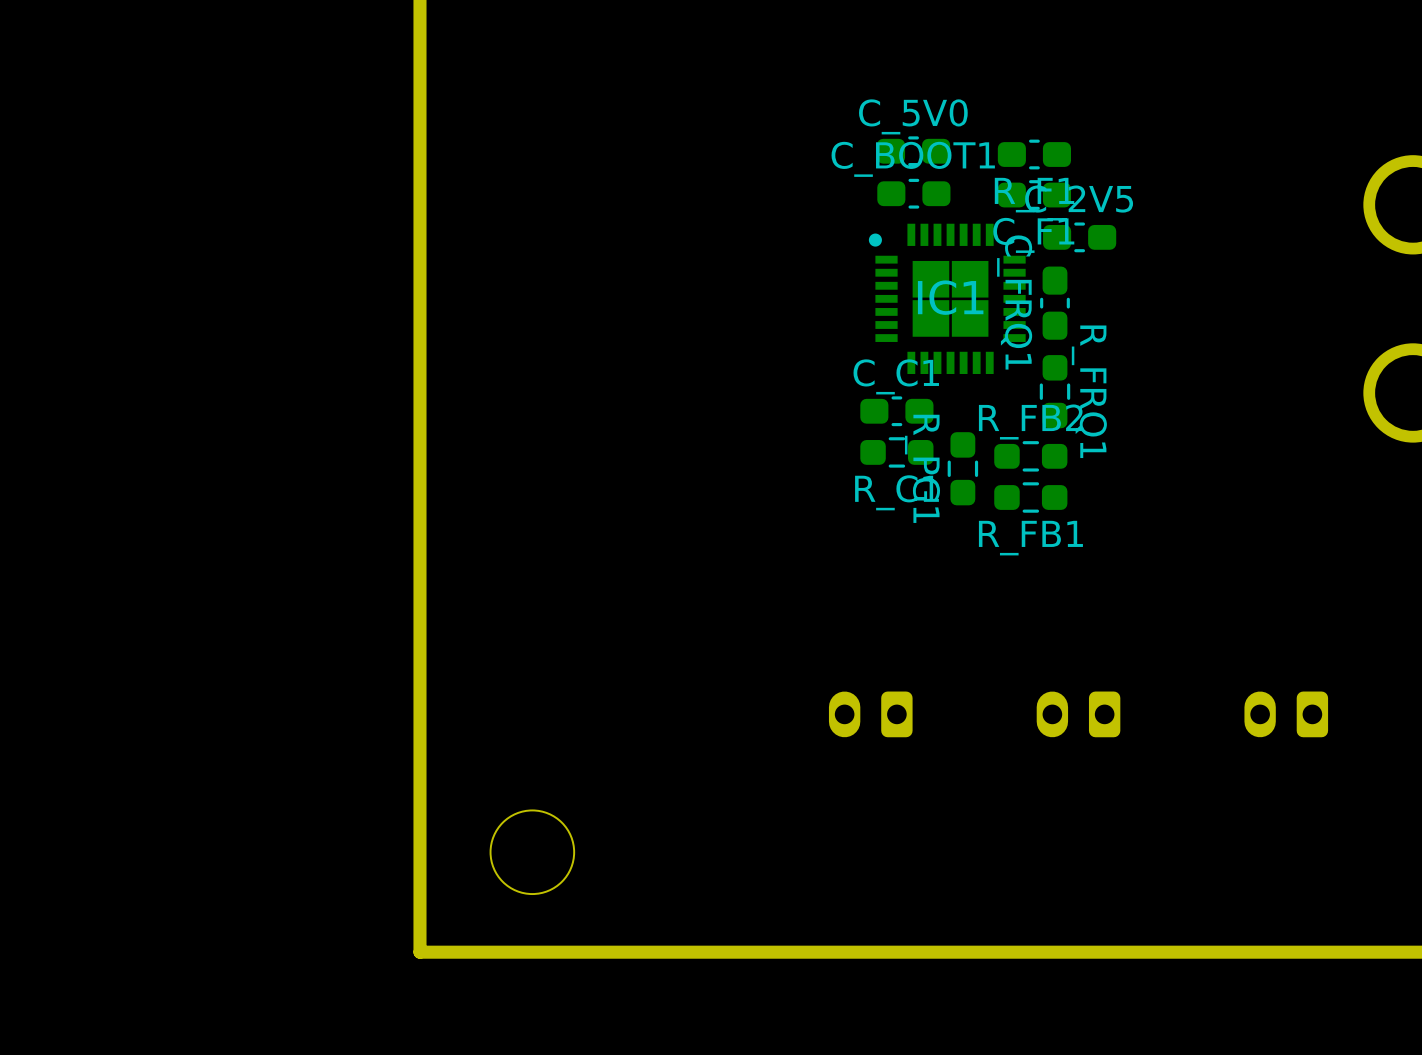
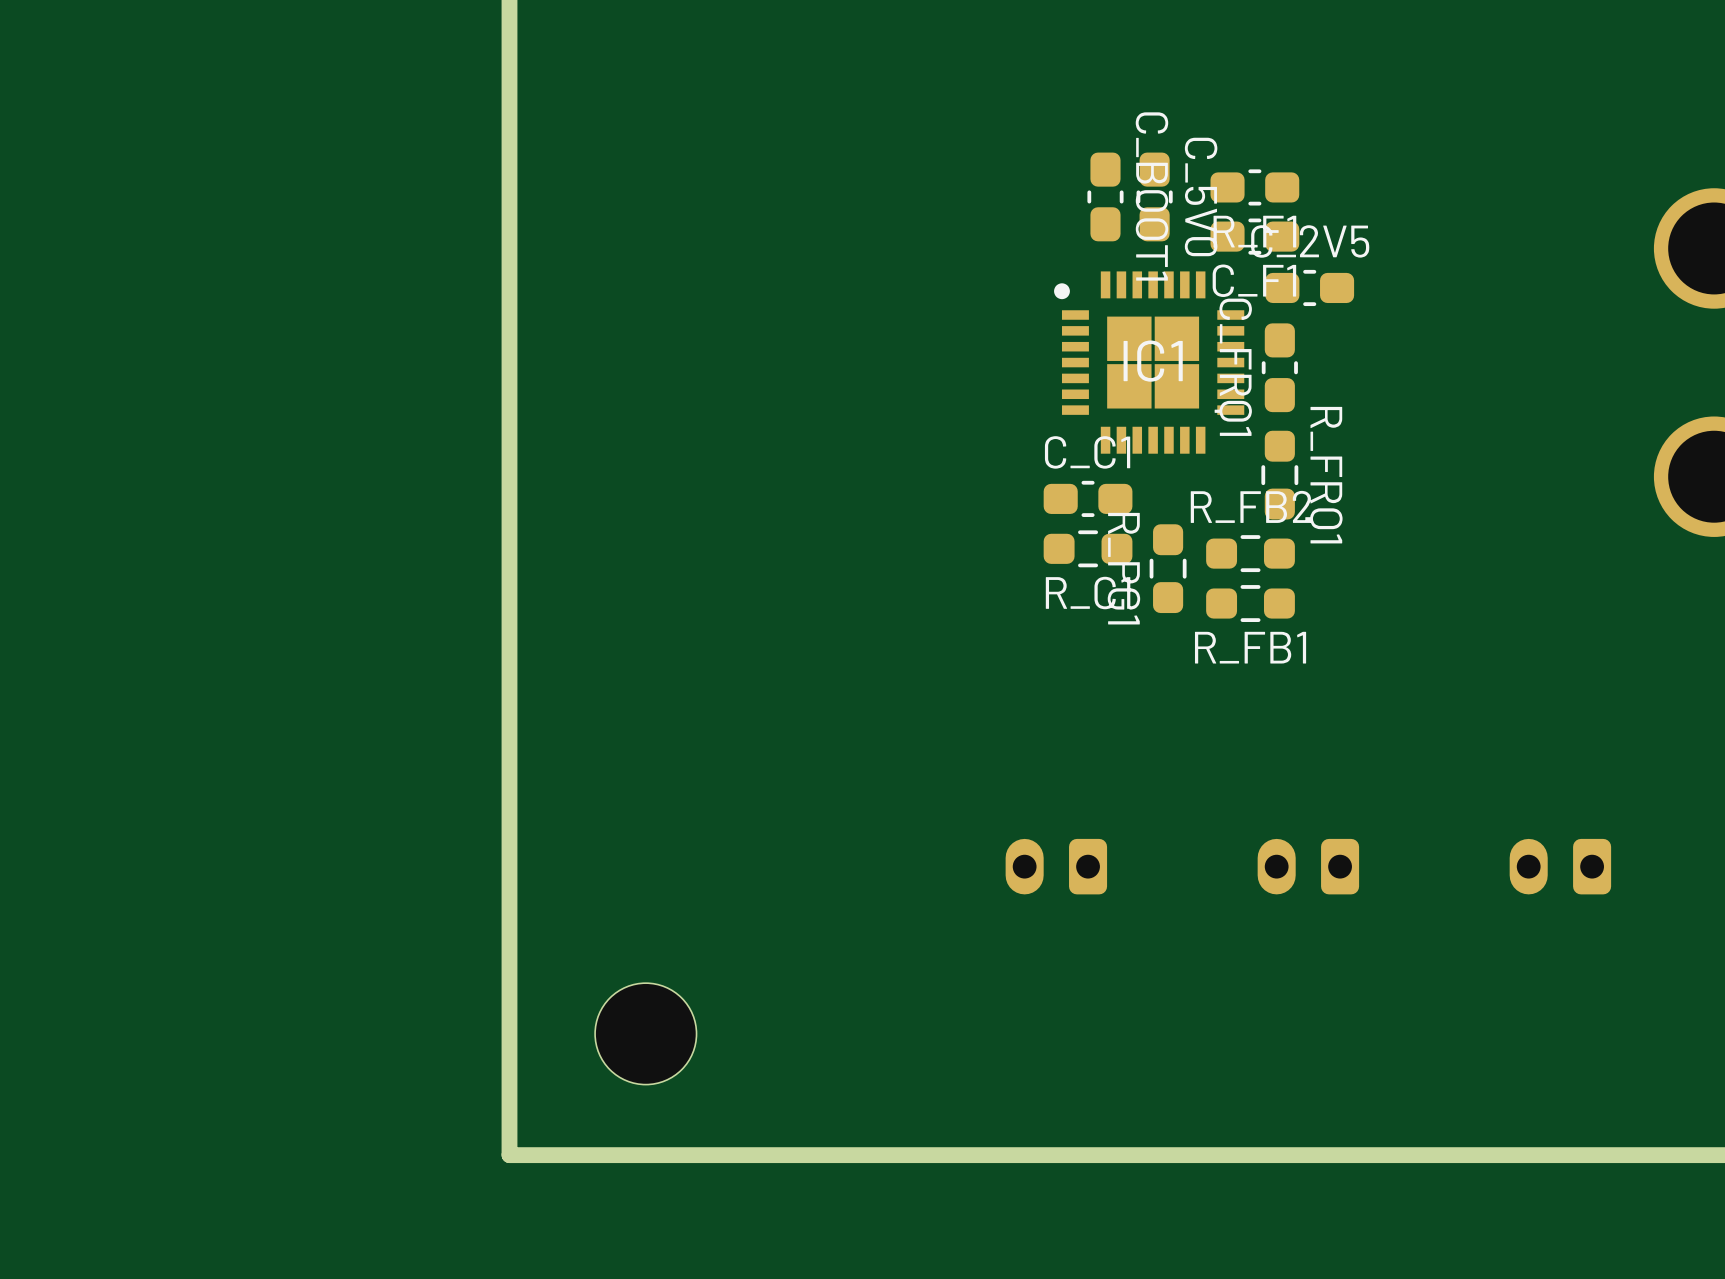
C_5V0 rotation: 0° (913, 151) -> 90° clockwise (1154, 196)
C_BOOT1 rotation: 0° (913, 193) -> 90° clockwise (1105, 196)

